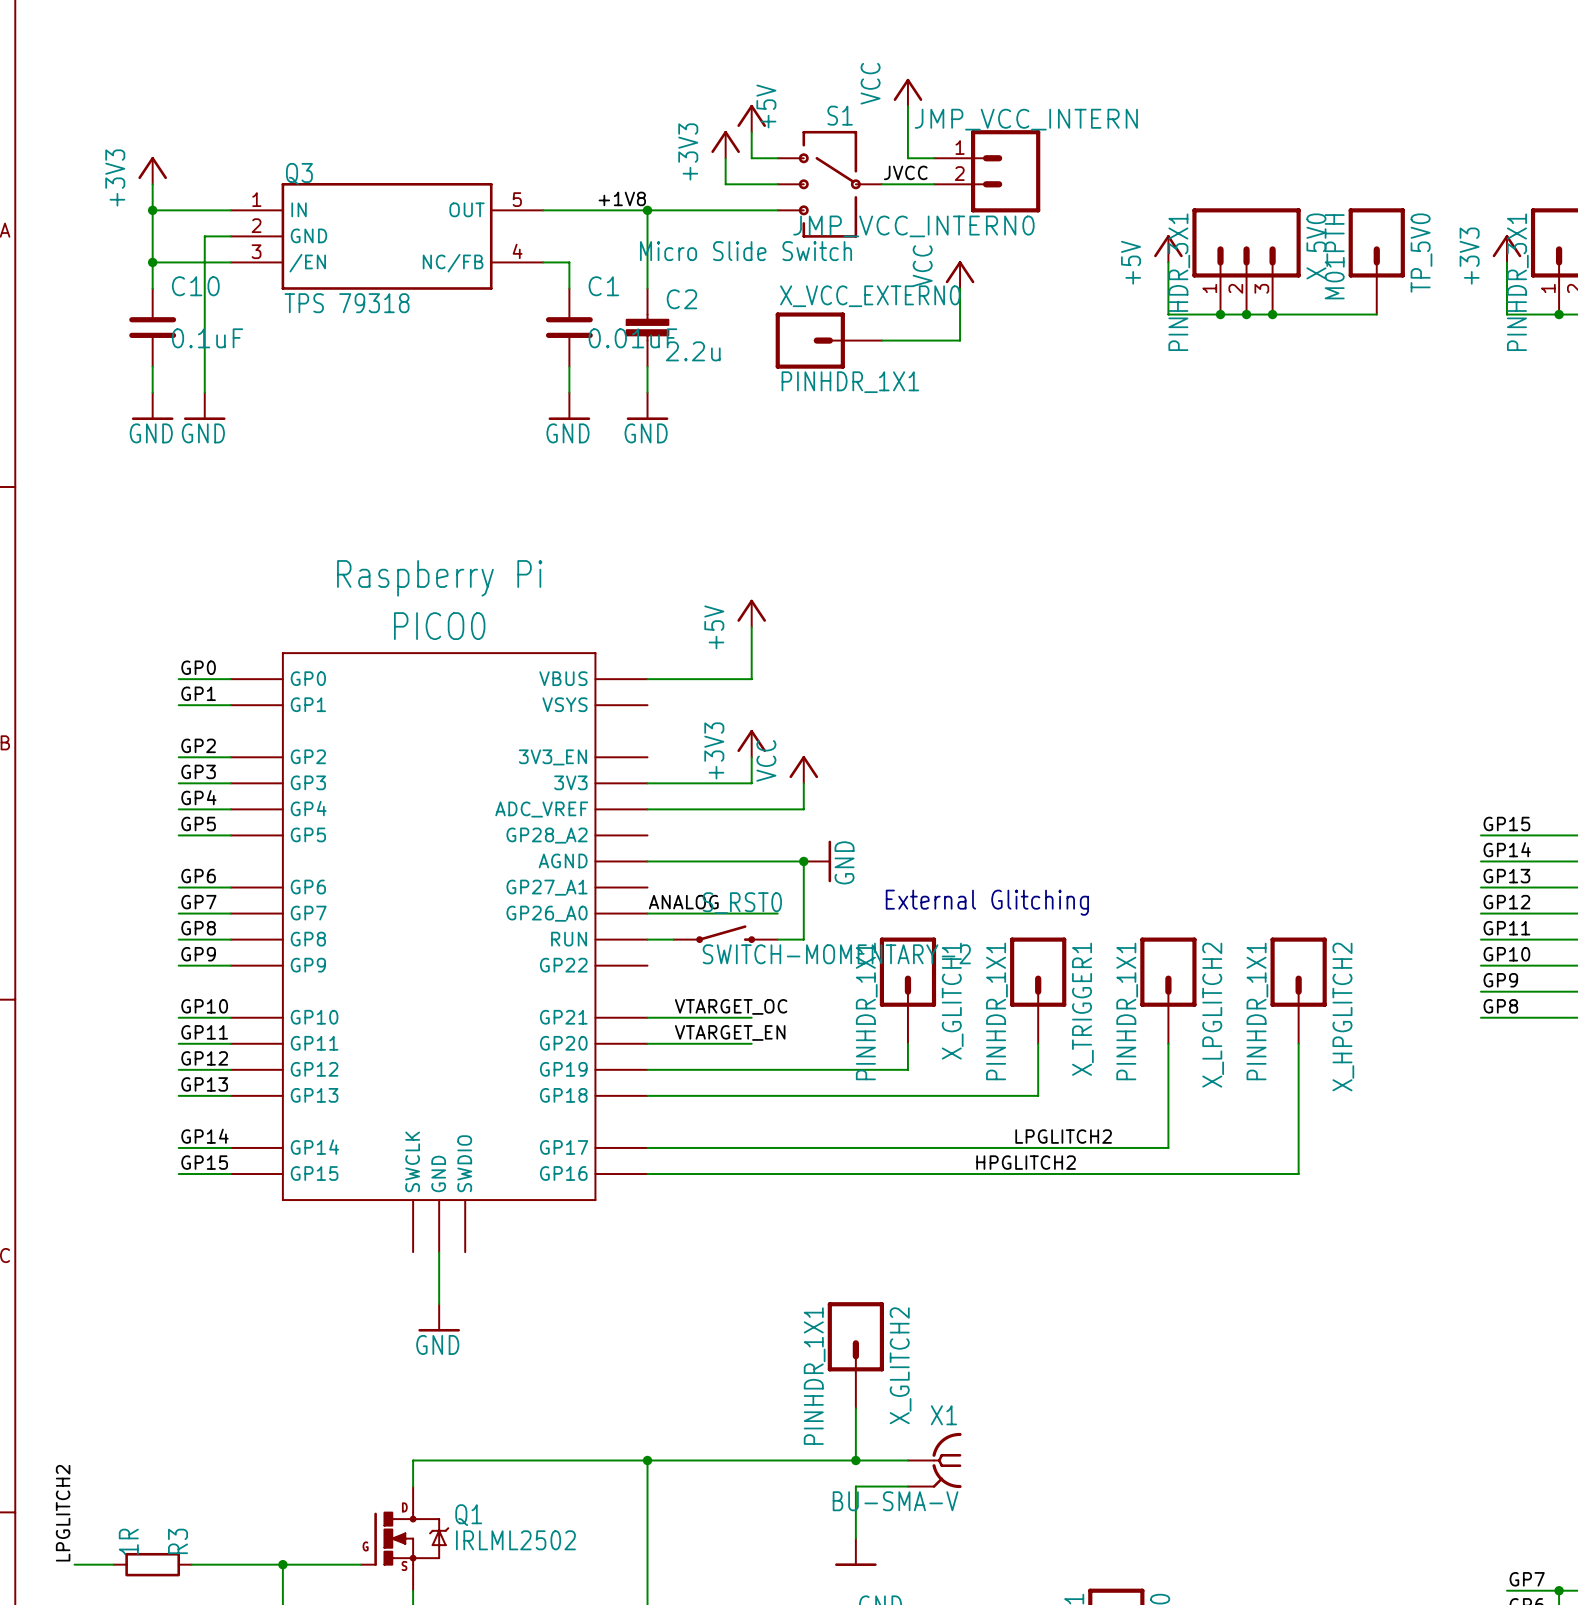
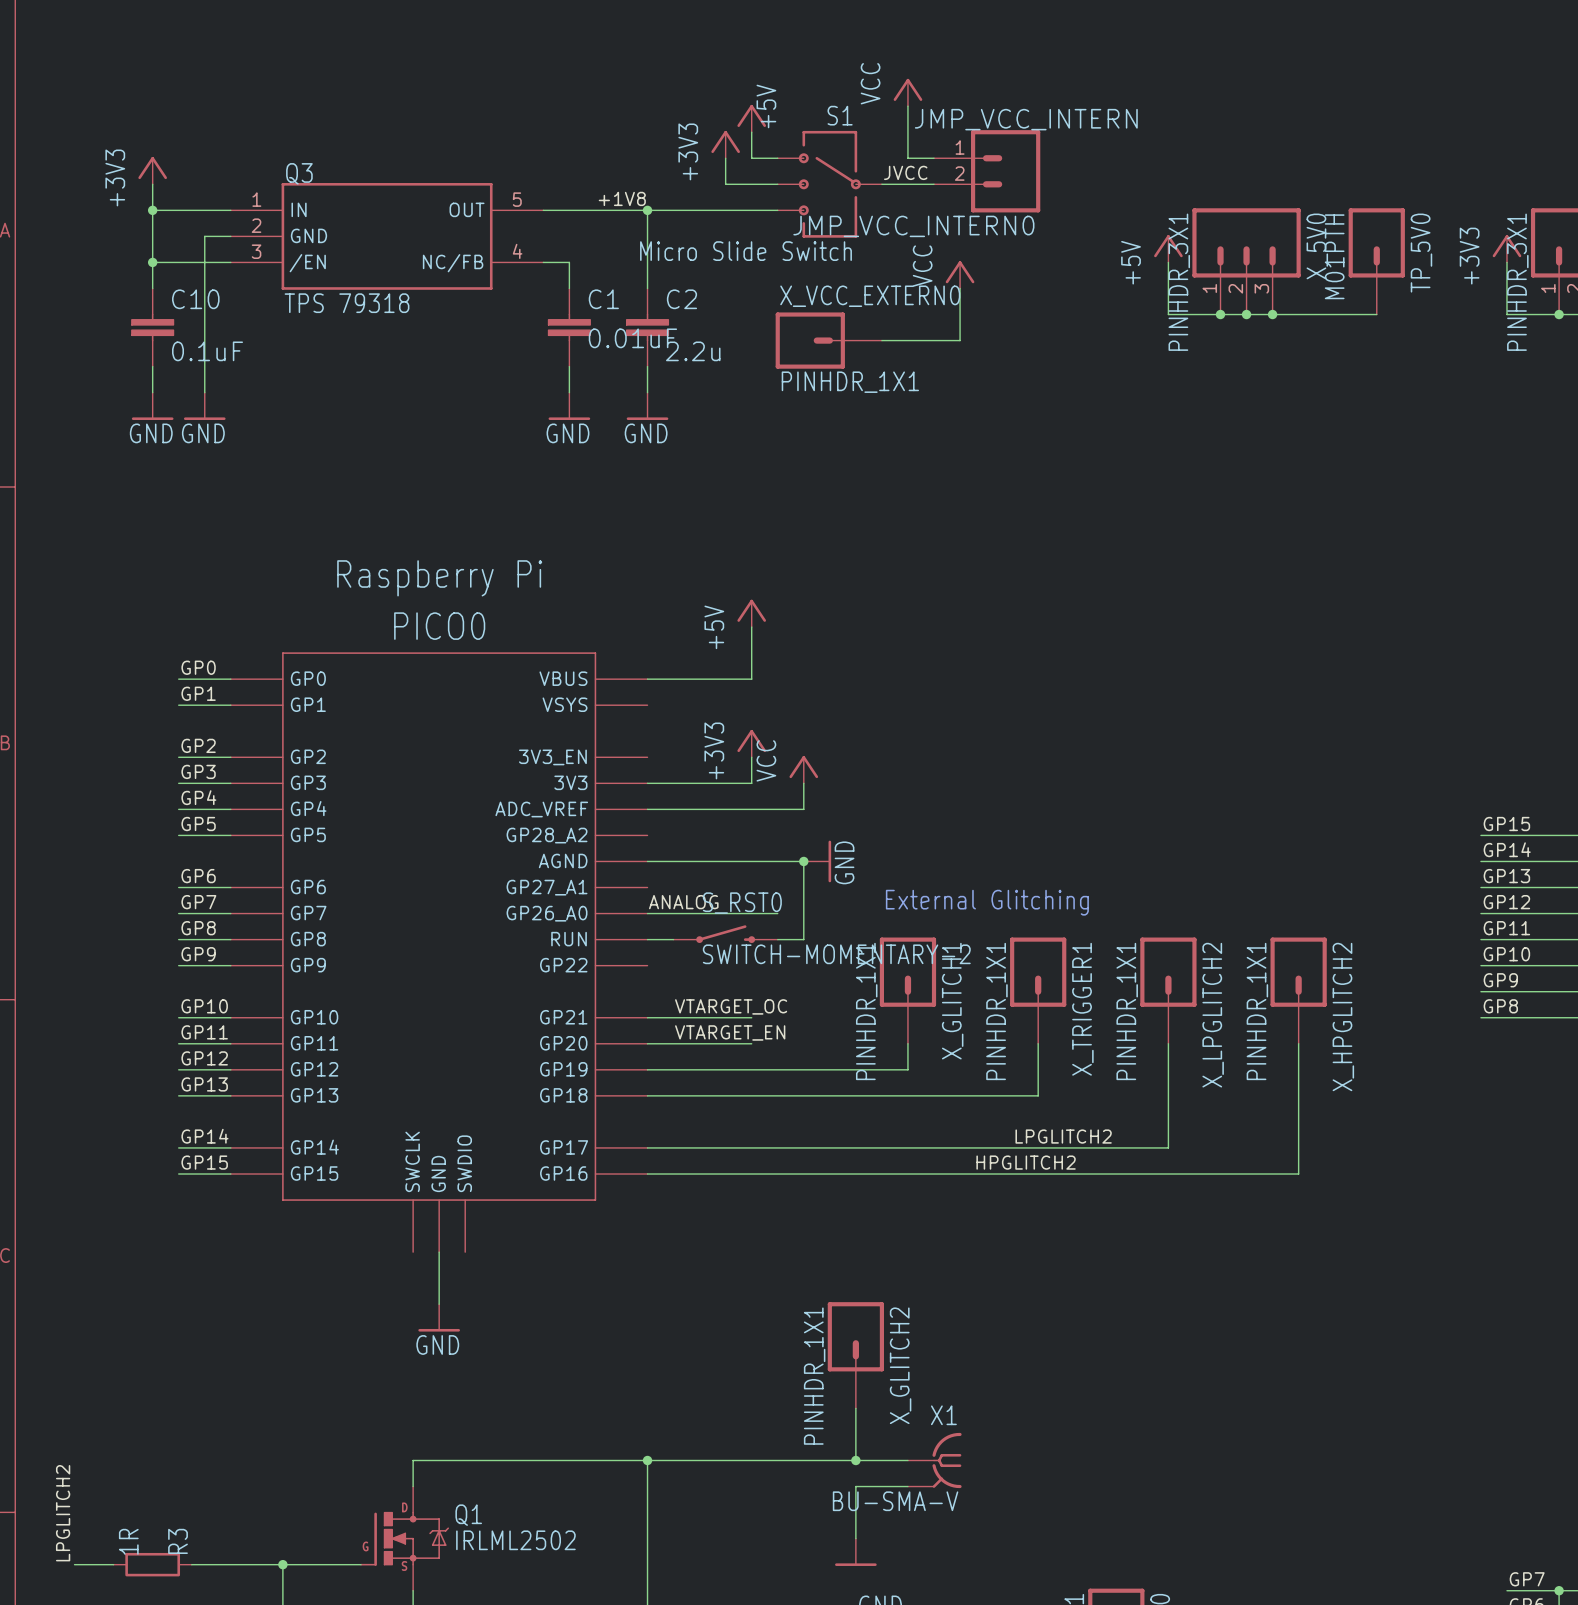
C10 name position: C10 (195, 286) -> C10 (195, 299)
C1 name position: C1 (603, 286) -> C1 (603, 299)
C10 symbol: [129, 288, 177, 367] -> [131, 288, 174, 367]
C1 symbol: [545, 288, 593, 367] -> [548, 288, 591, 367]
C10 value position: 0.1uF (207, 338) -> 0.1uF (207, 351)

